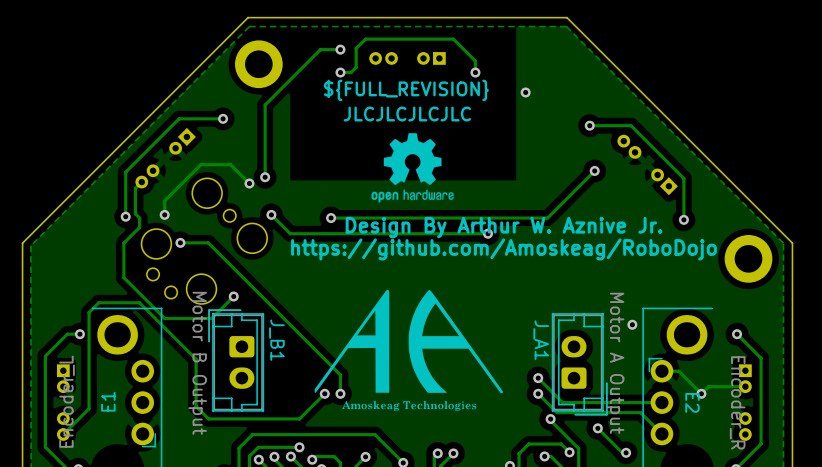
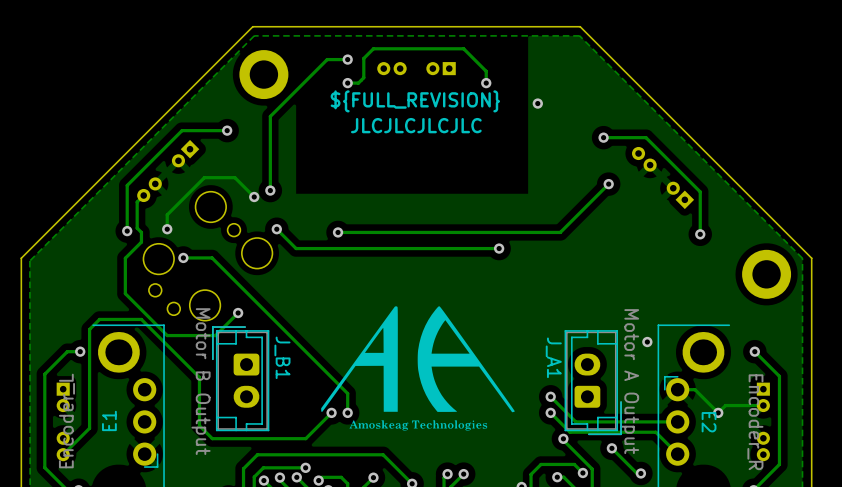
drawing: [371, 133, 454, 203] -> none
text: Design By Arthur W. Aznive Jr. (504, 227) -> none
text: https://github.com/Amoskeag/RoboDojo (504, 249) -> none

